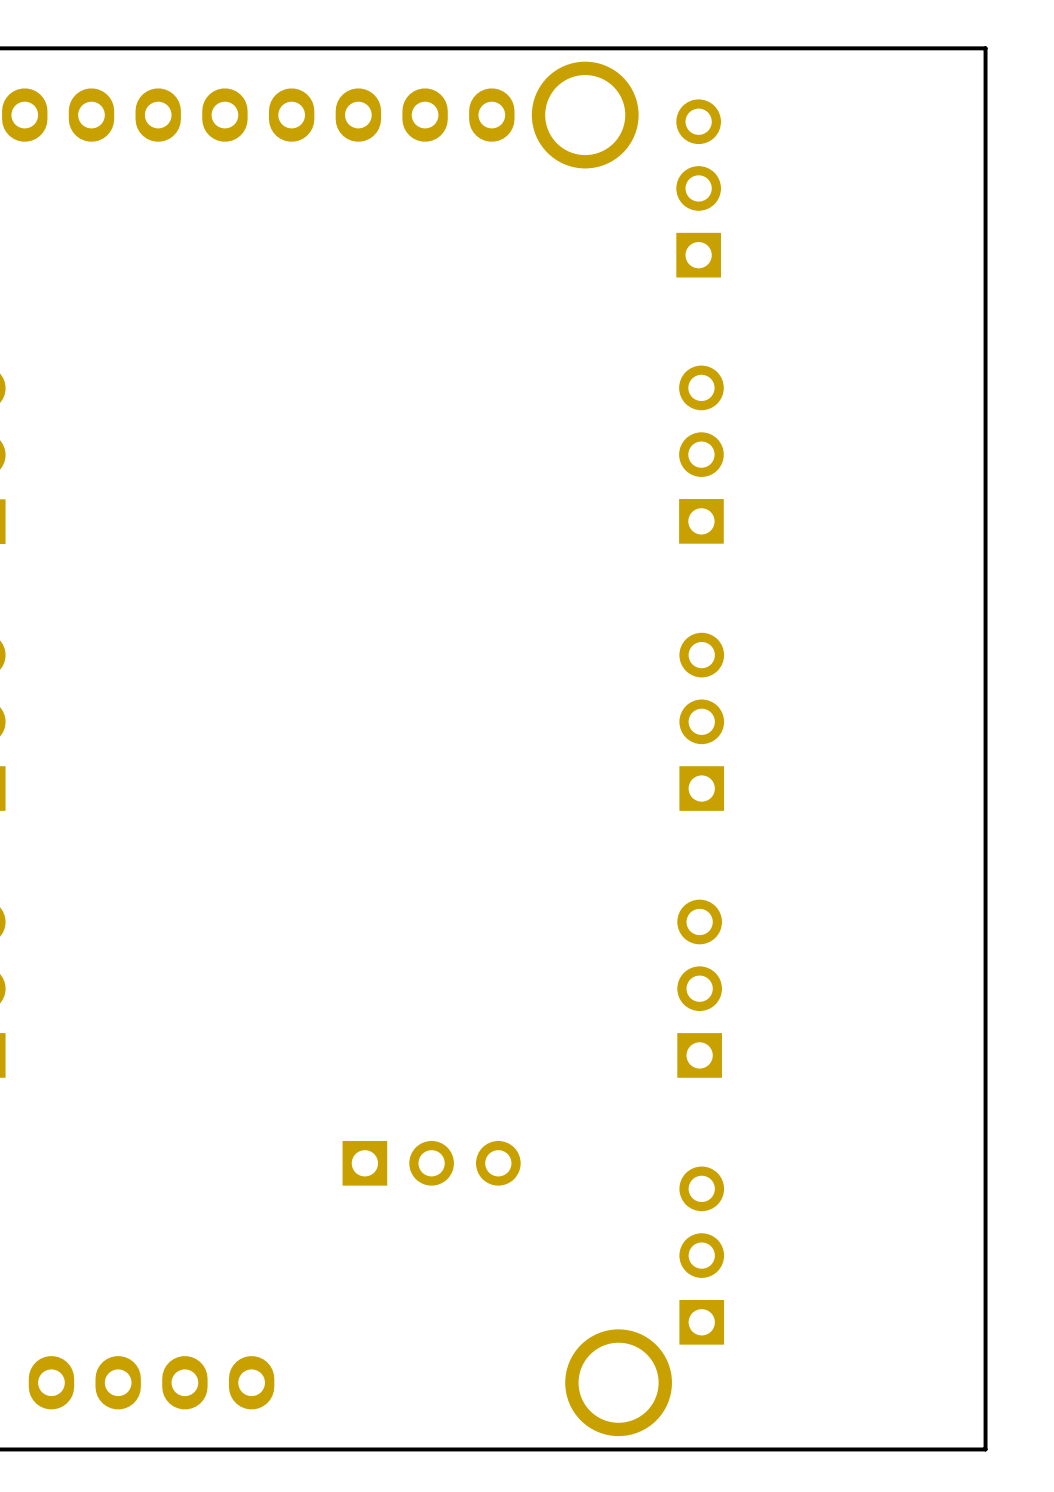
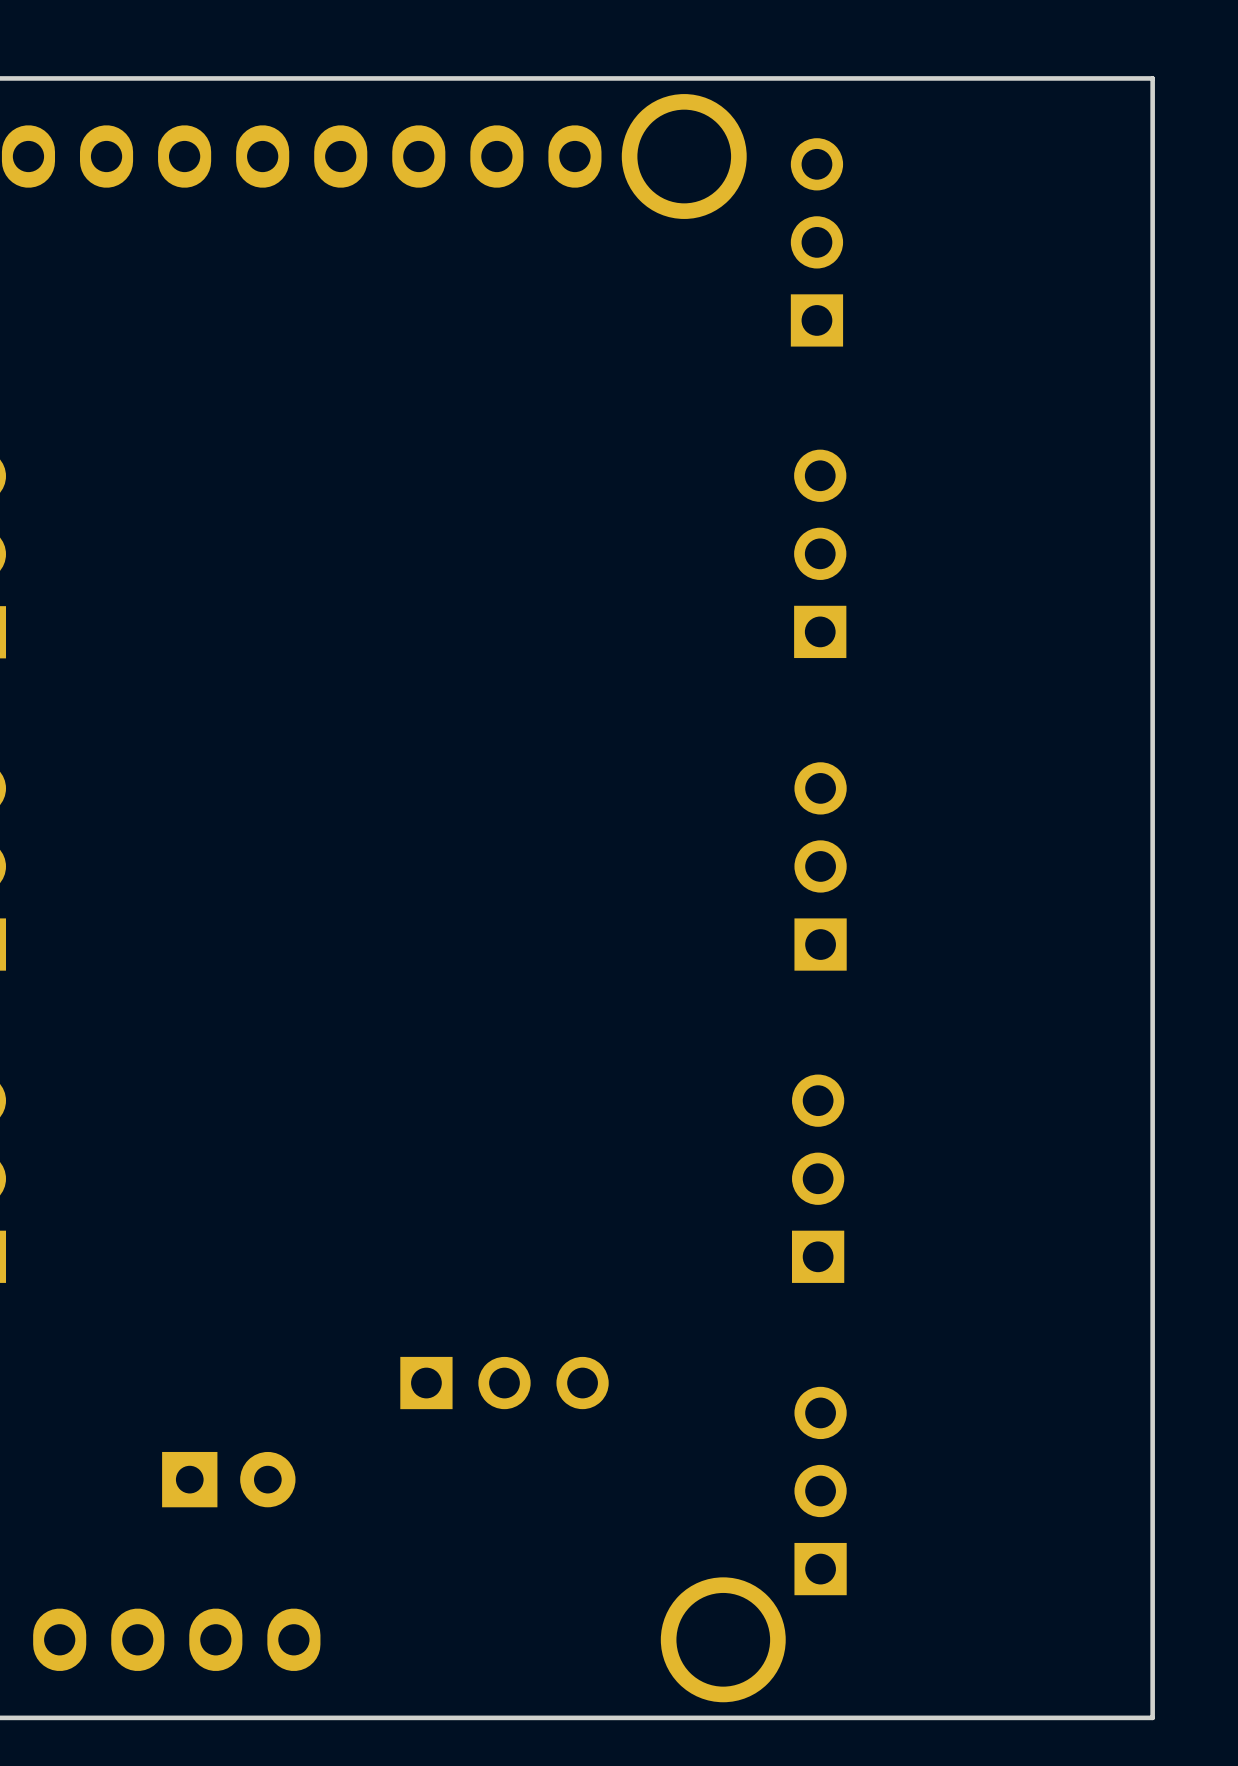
part: none -> (228, 1479)

